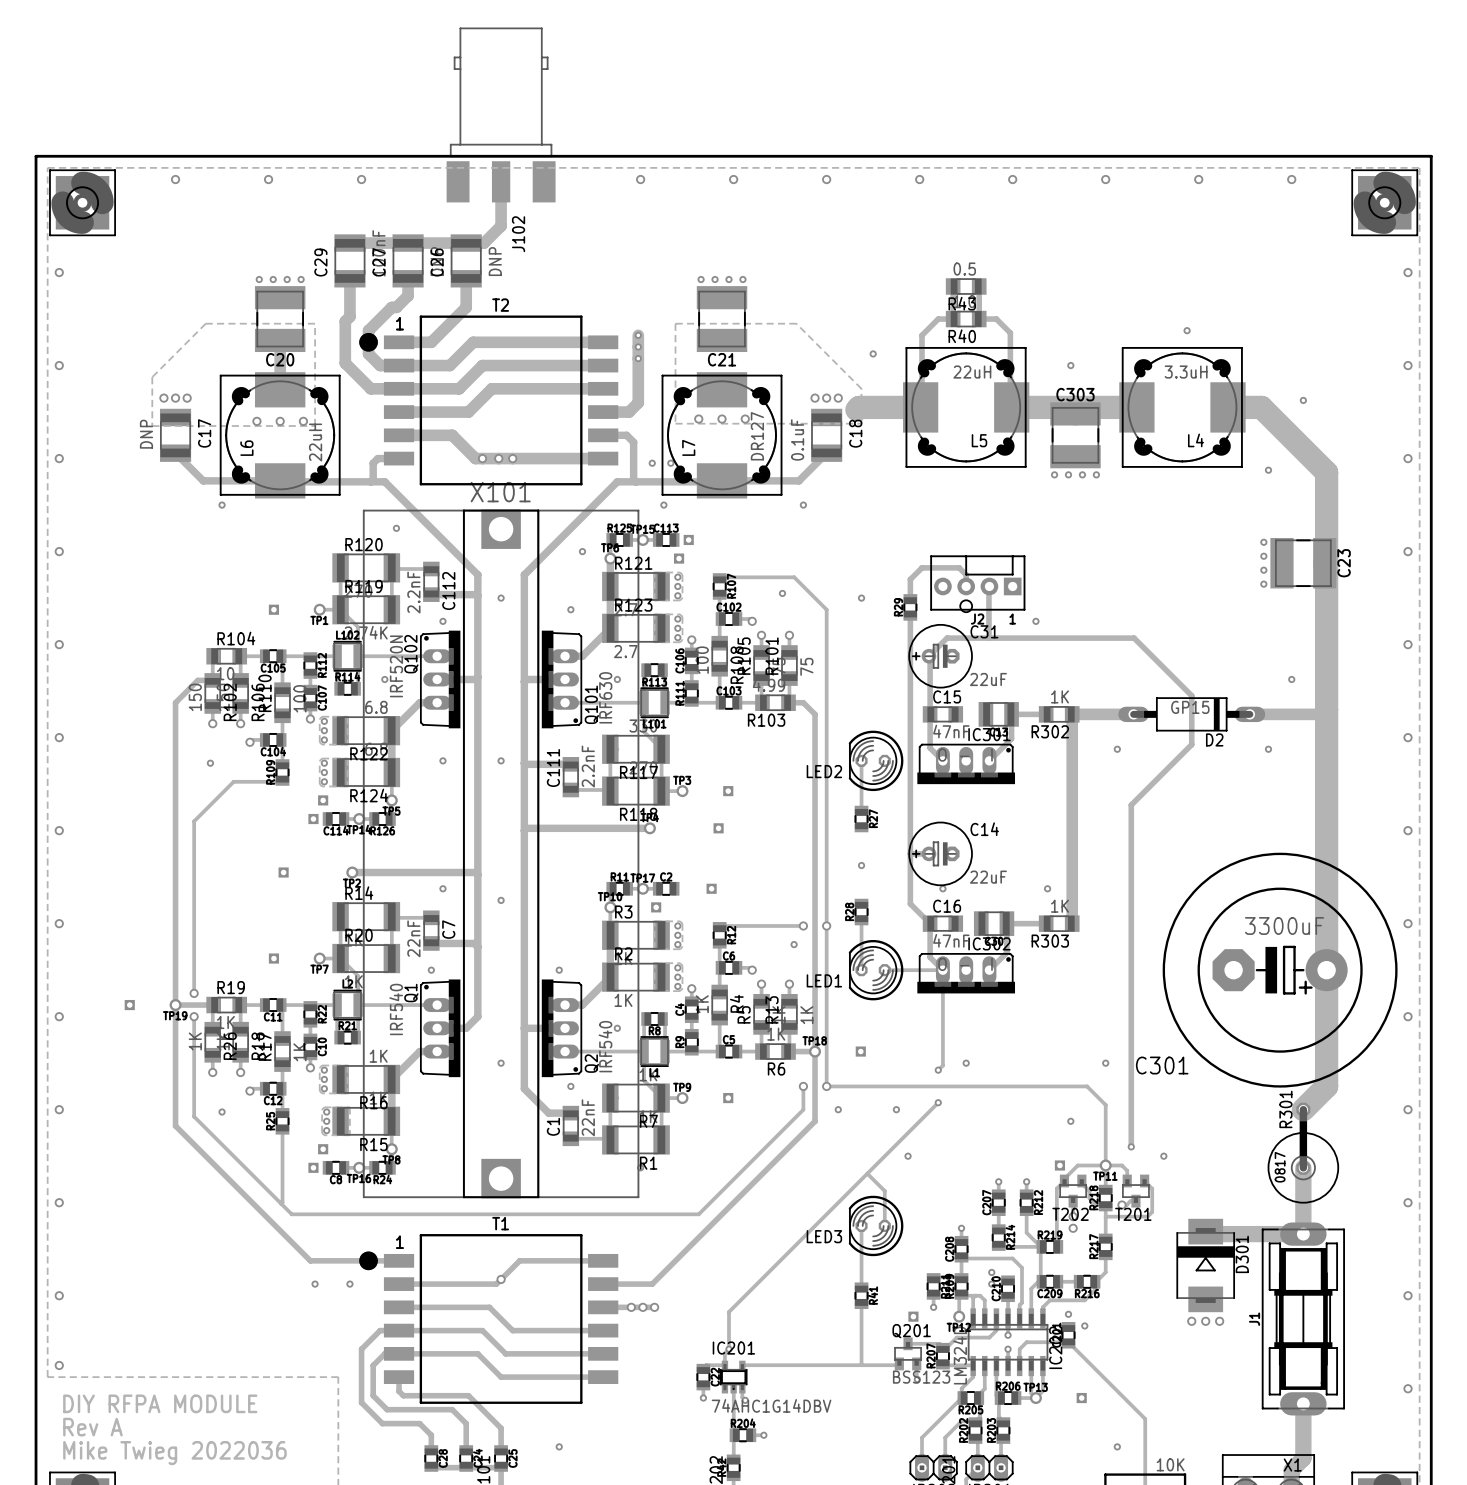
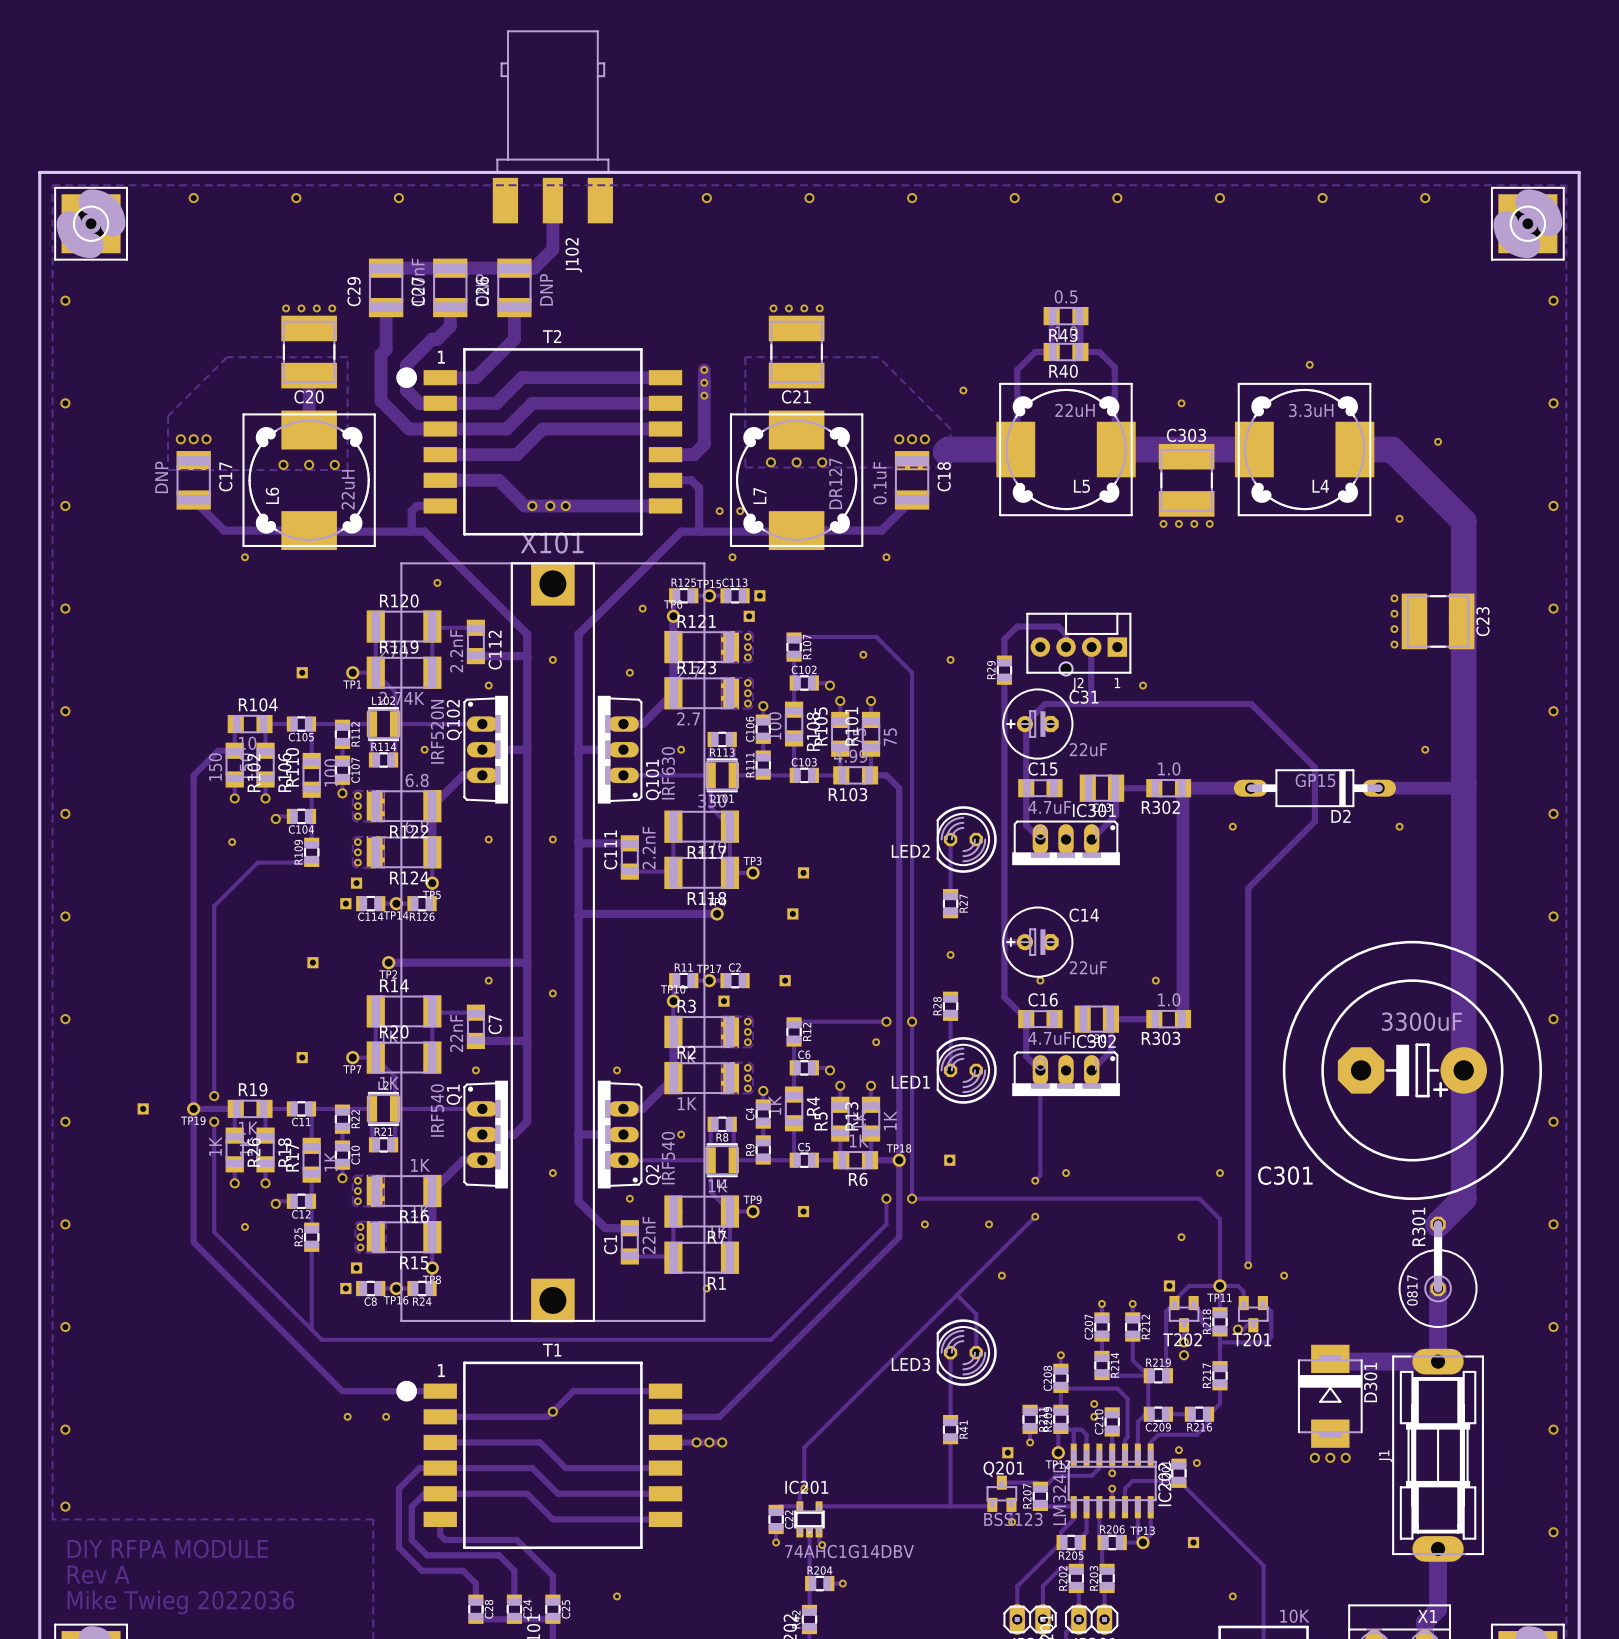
R302 value: 1K (1060, 696) -> 1.0 (1169, 768)
C15 value: 47nF (951, 731) -> 4.7uF (1049, 807)
R303 value: 1K (1060, 906) -> 1.0 (1169, 999)
C16 value: 47nF (951, 940) -> 4.7uF (1049, 1038)
track: (884, 970) (942, 970) -> none

